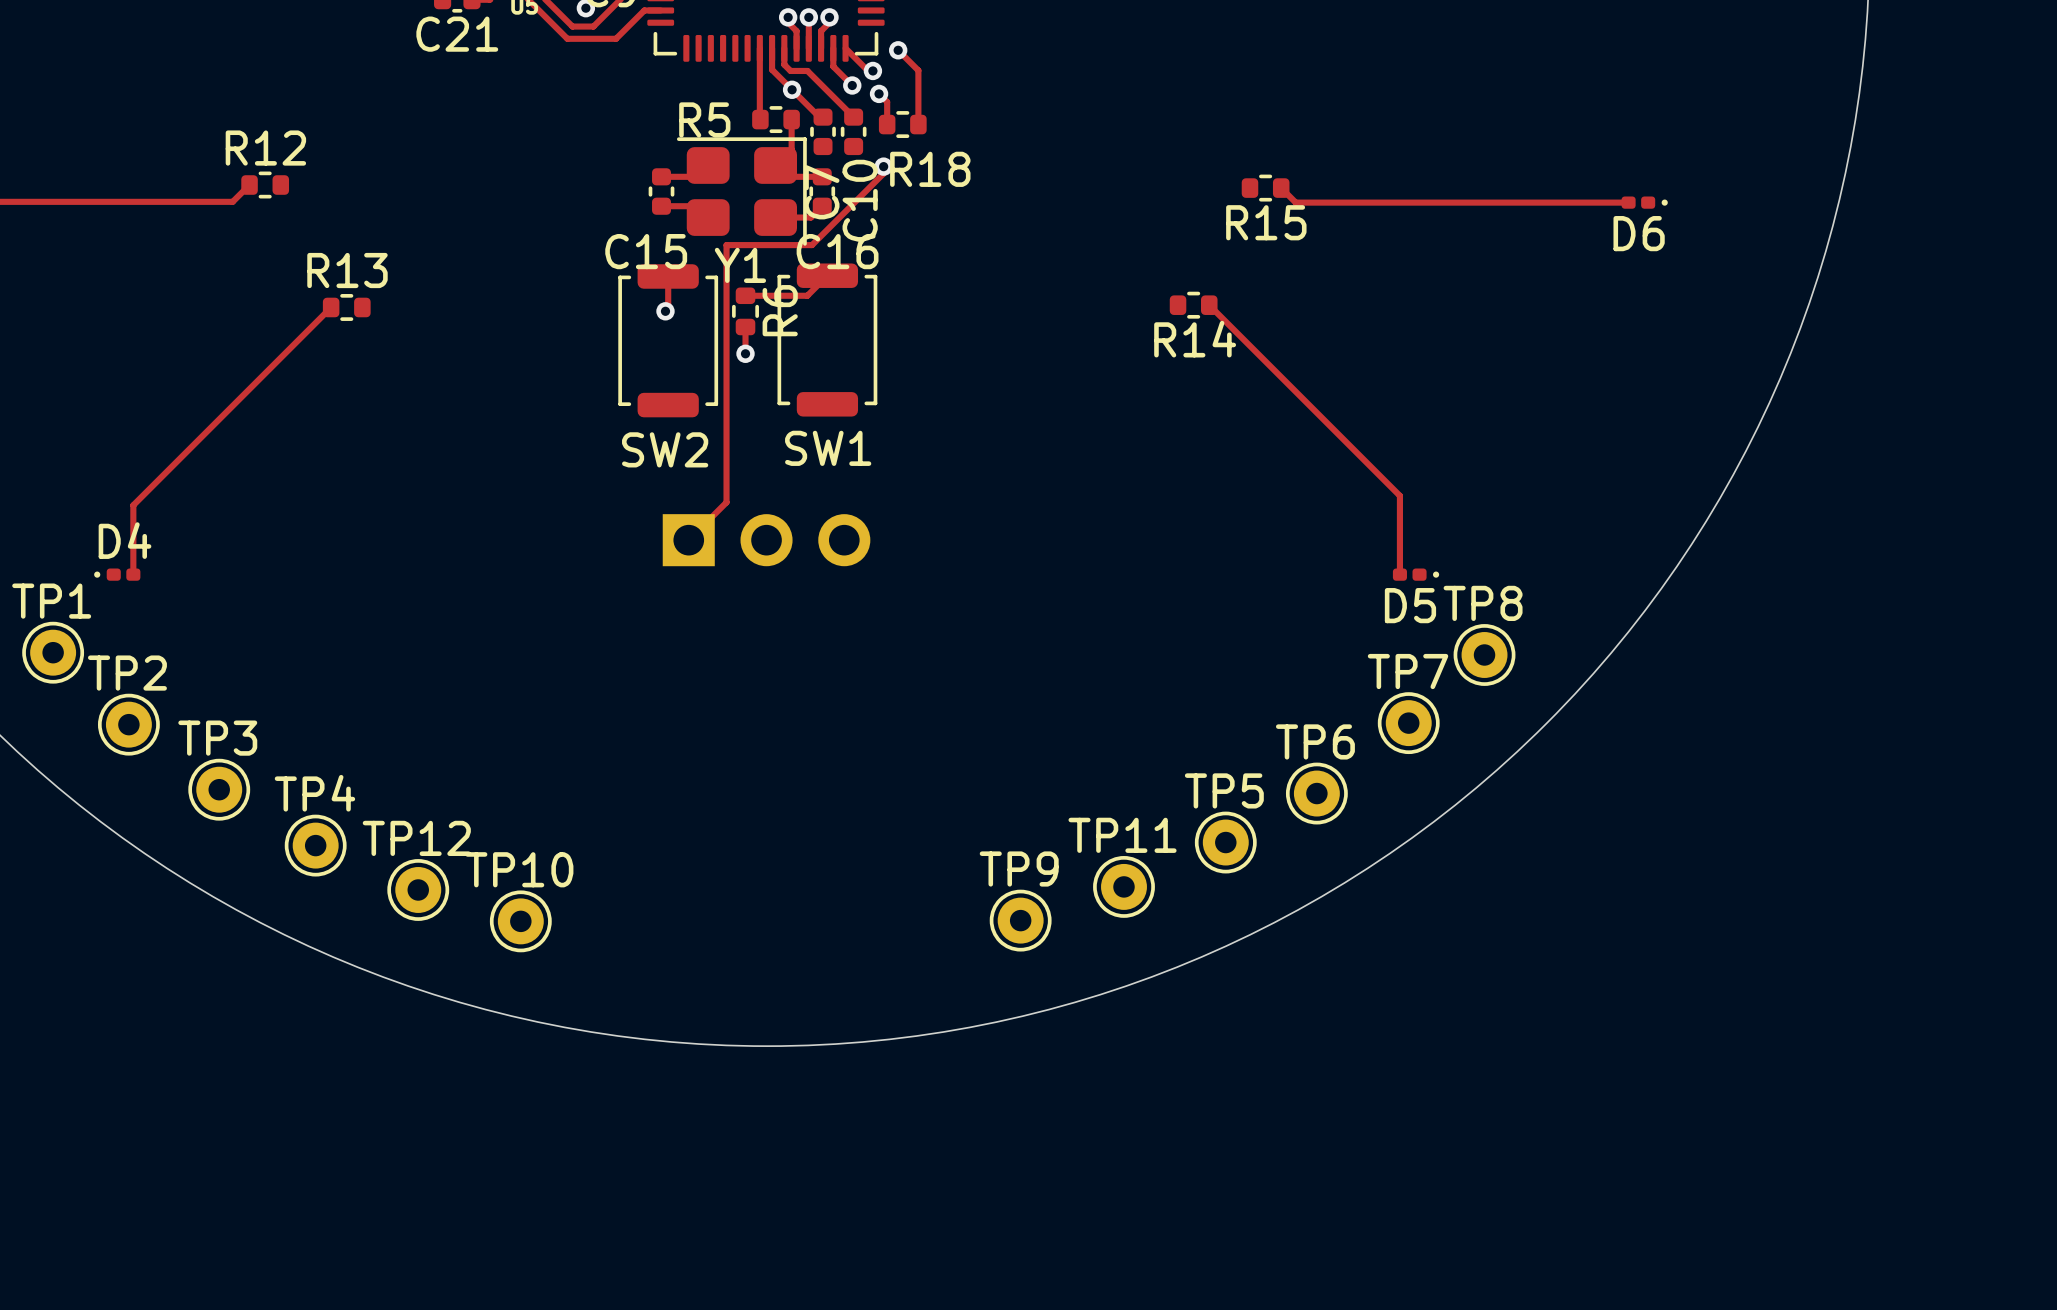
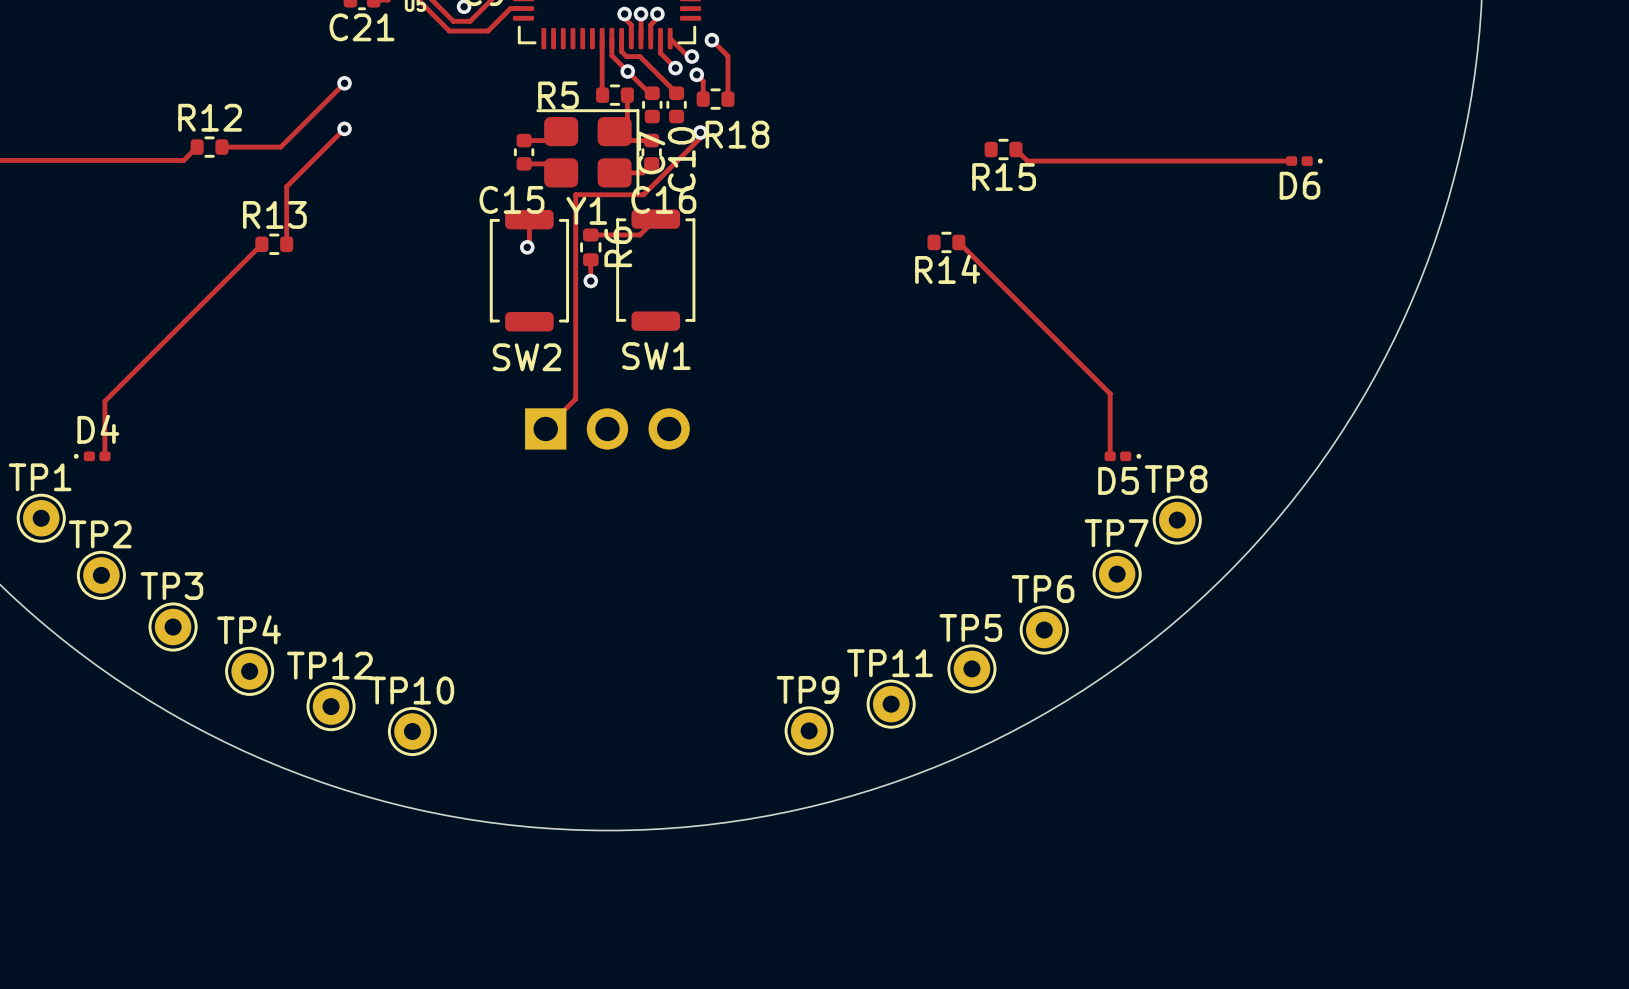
track: none -> (344, 83) (280, 147) (221, 147)
via: none -> (344, 83)
track: none -> (344, 128) (286, 186) (286, 244)
via: none -> (344, 128)

